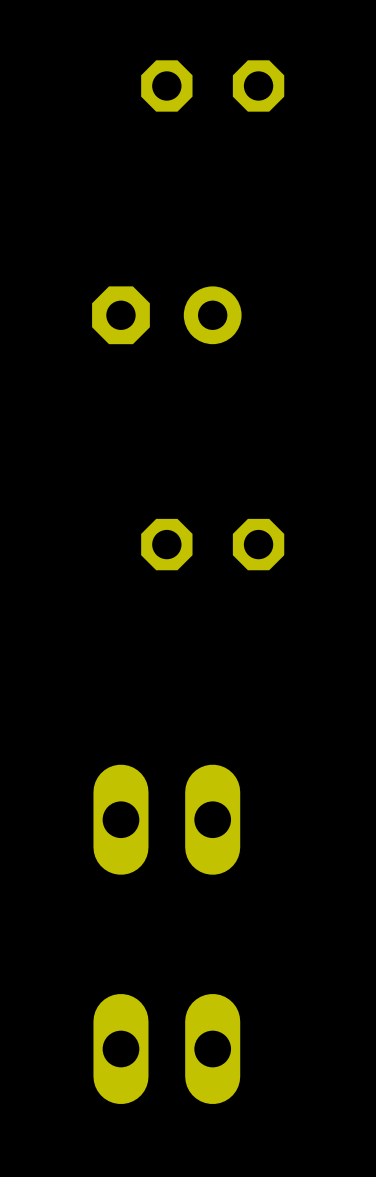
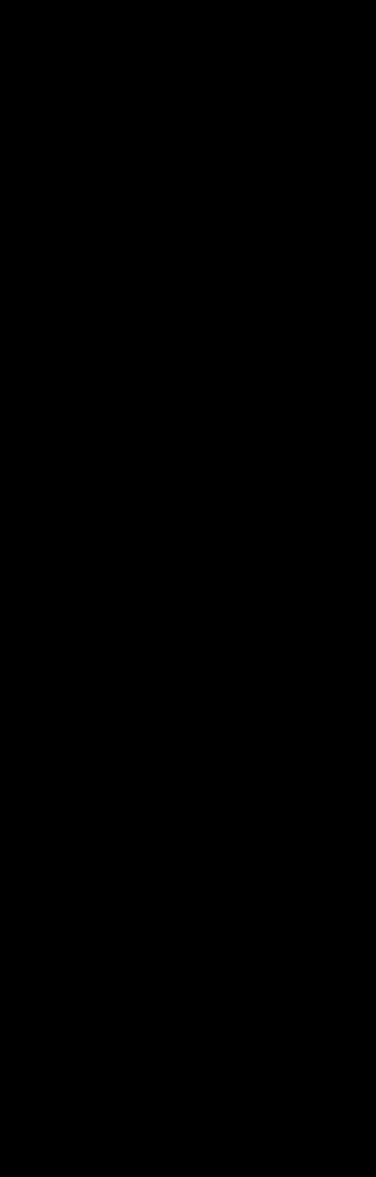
part: (212, 85) -> none
part: (166, 315) -> none
part: (212, 544) -> none
part: (166, 819) -> none
part: (166, 1049) -> none

